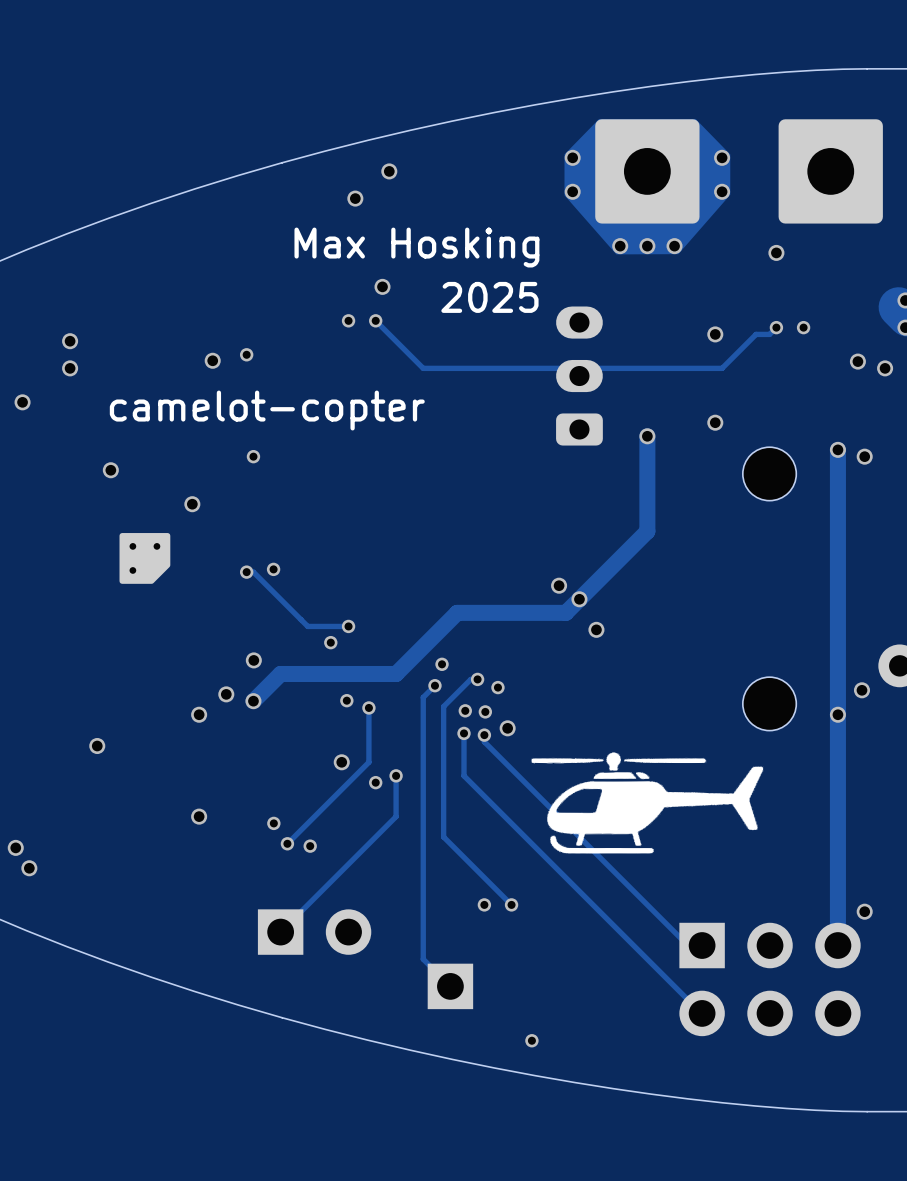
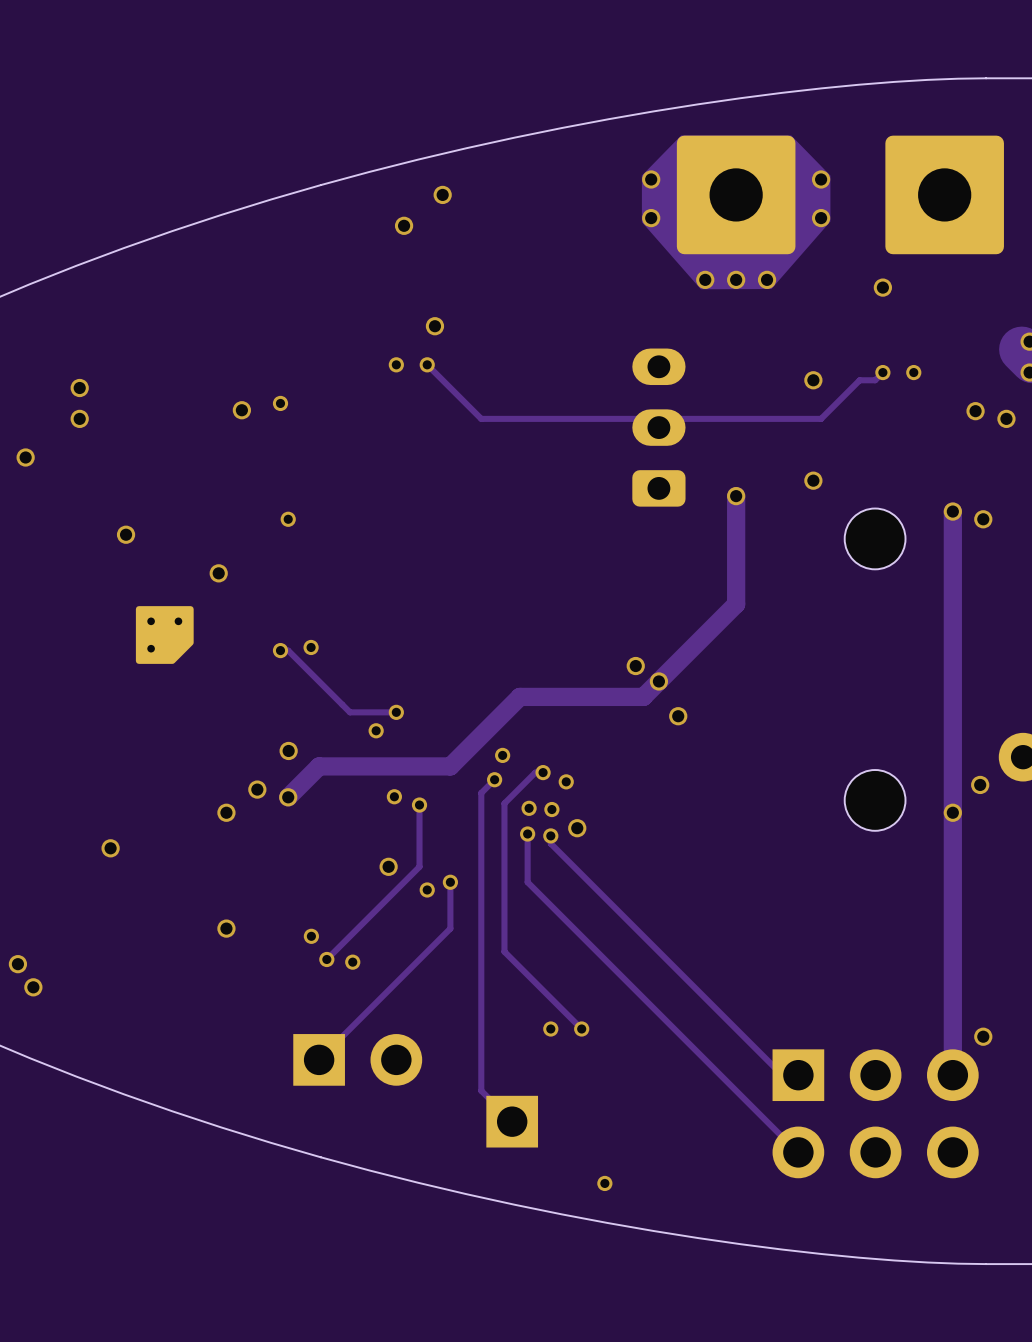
text: Max Hosking (416, 247) -> none
text: 2025 (489, 297) -> none
text: camelot-copter (267, 410) -> none
drawing: [531, 751, 764, 855] -> none

